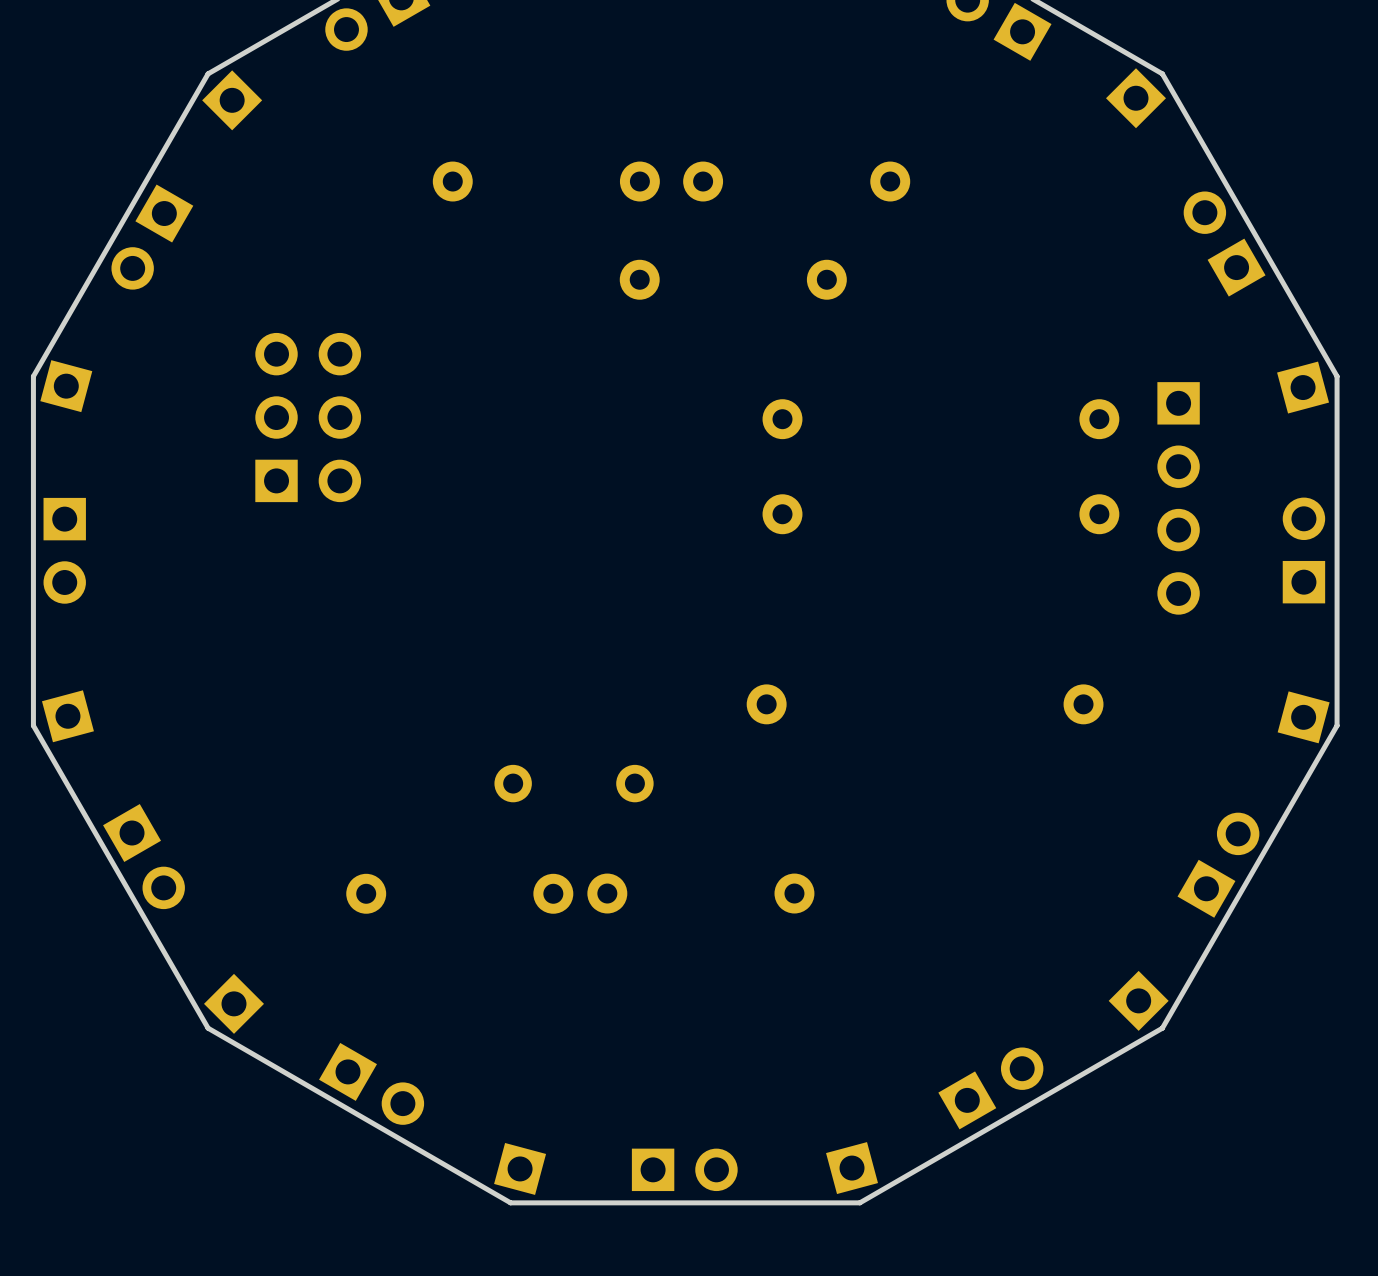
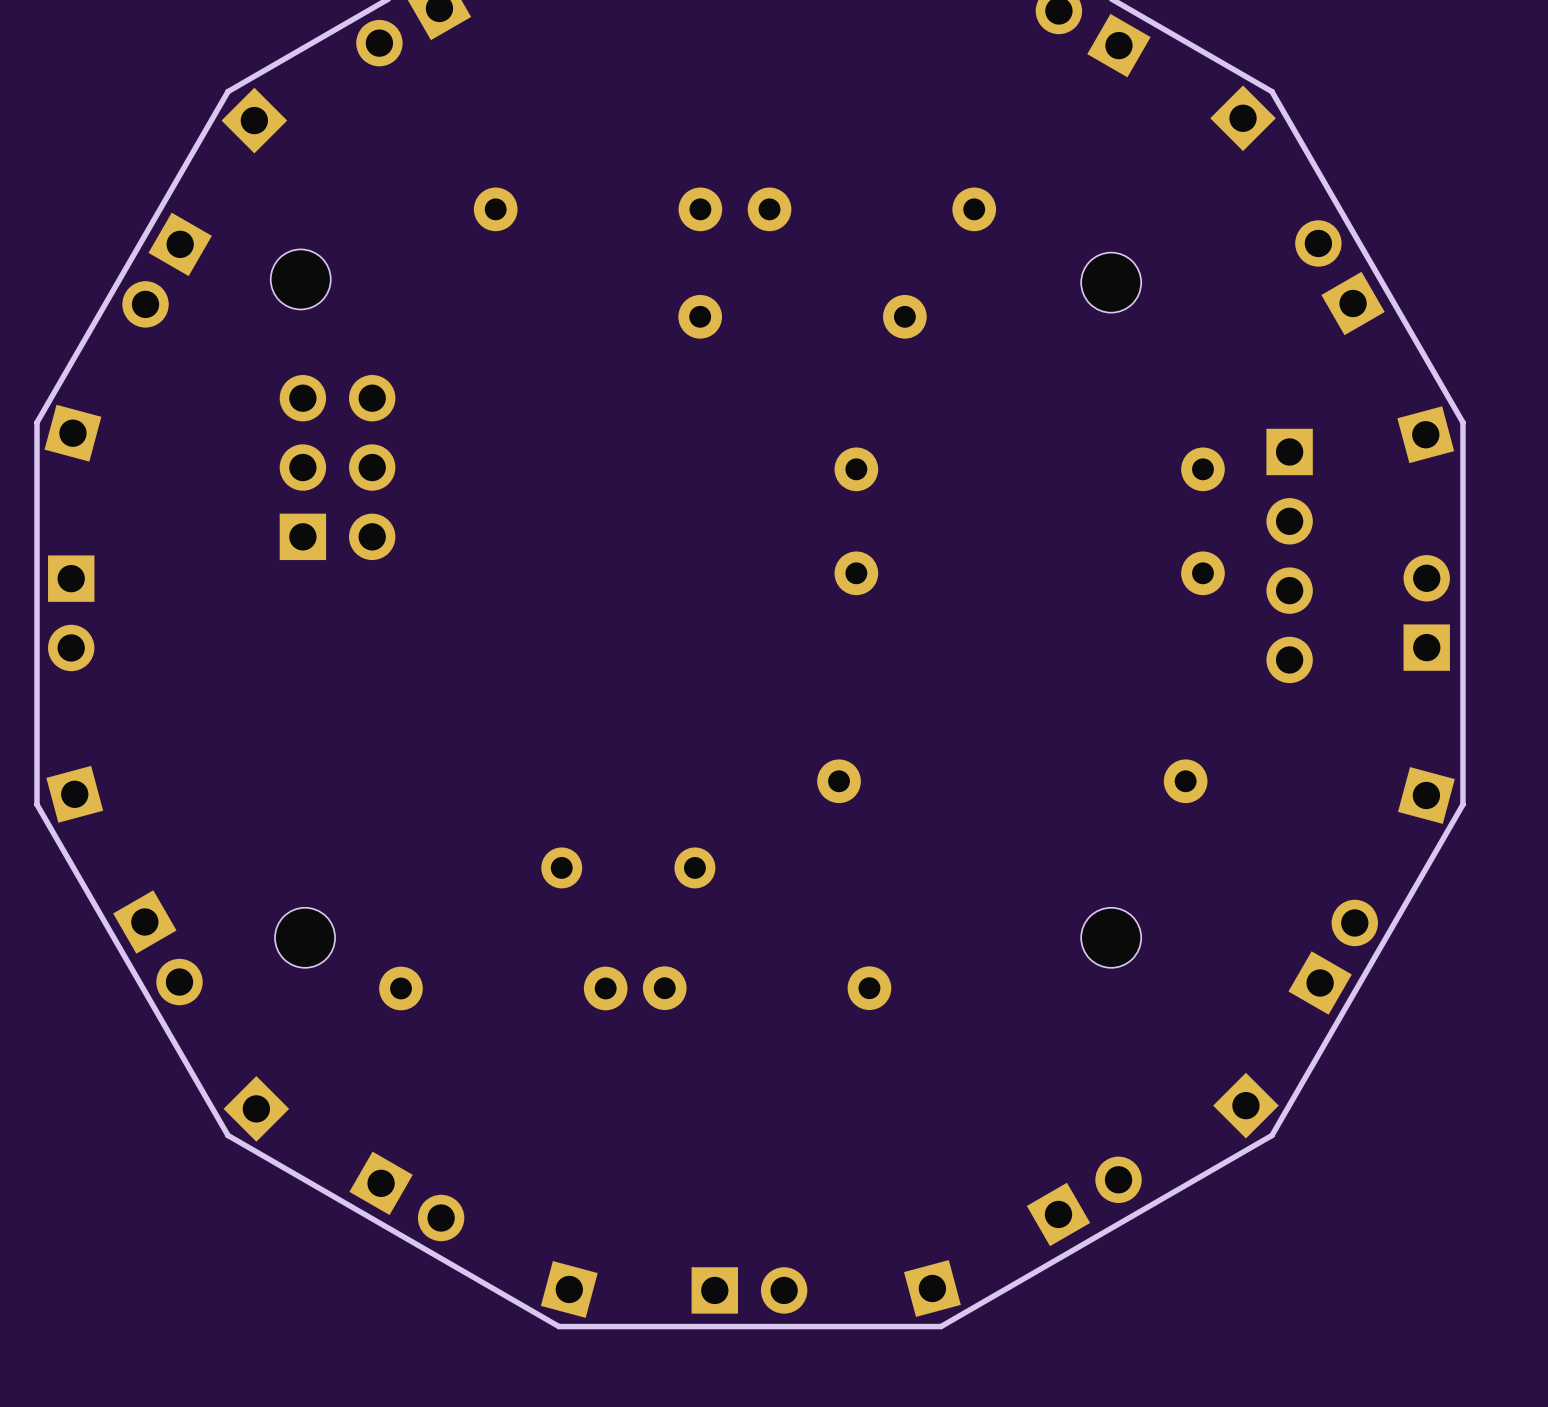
part: none -> (300, 279)
part: none -> (1111, 282)
part: none -> (305, 937)
part: none -> (1111, 937)

